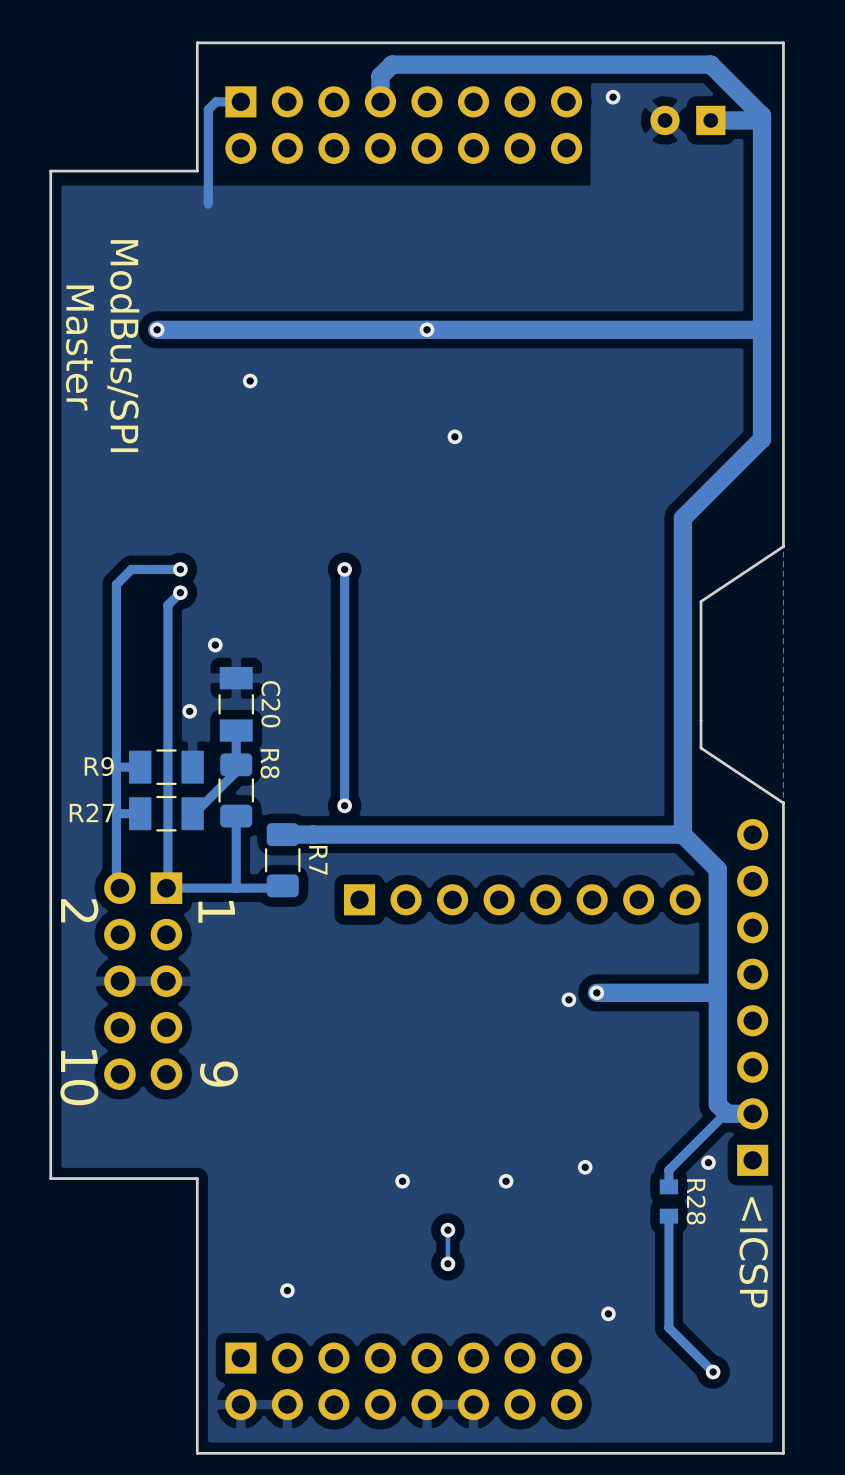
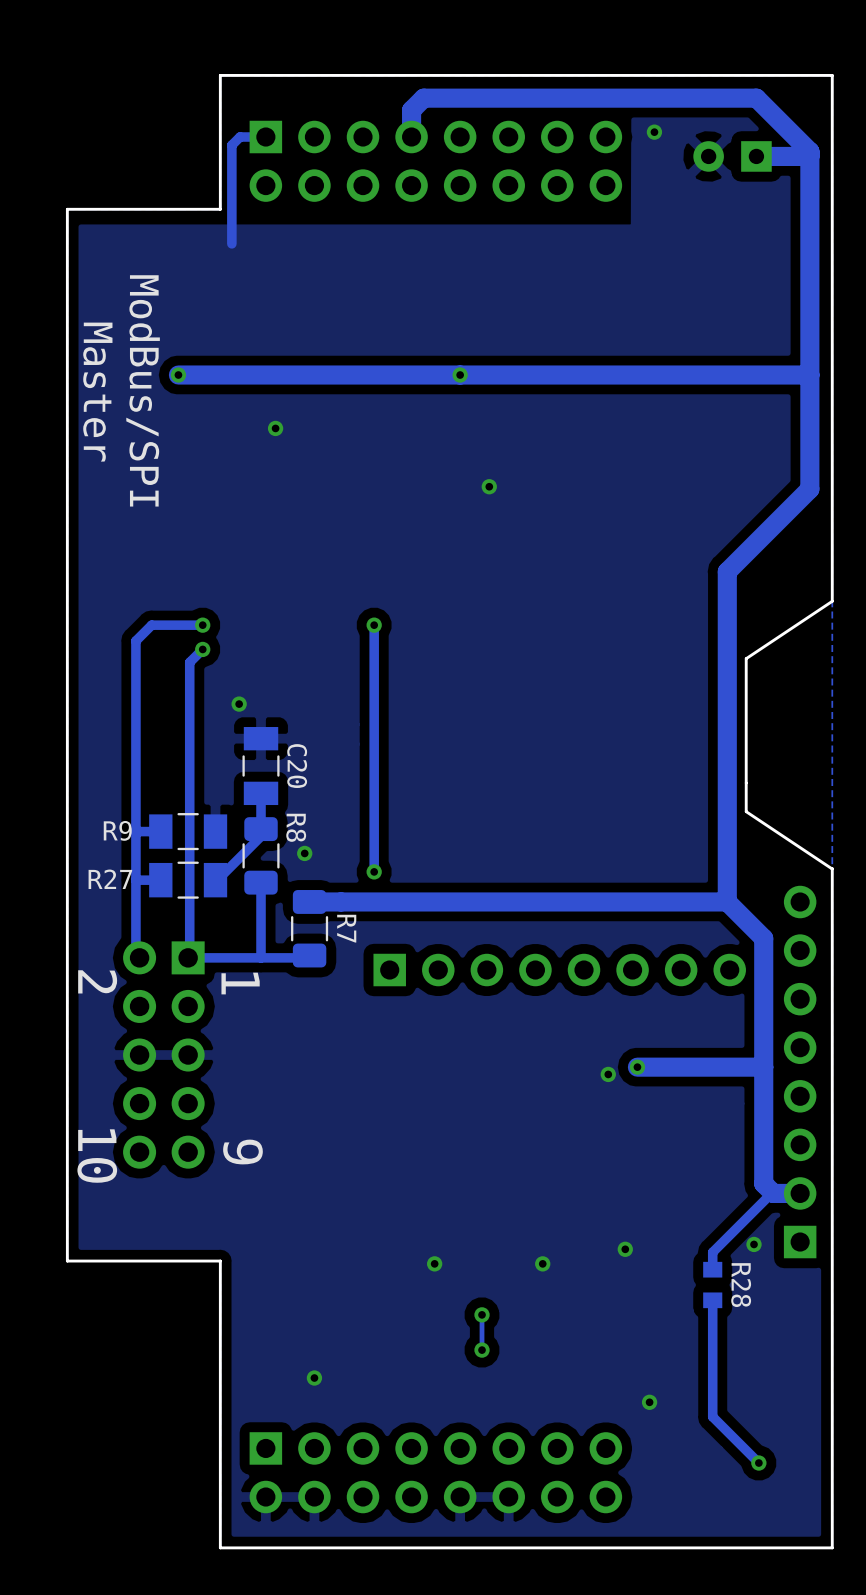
via: (189, 711) -> none
via: none -> (304, 853)
text: <ICSP (753, 1252) -> none

